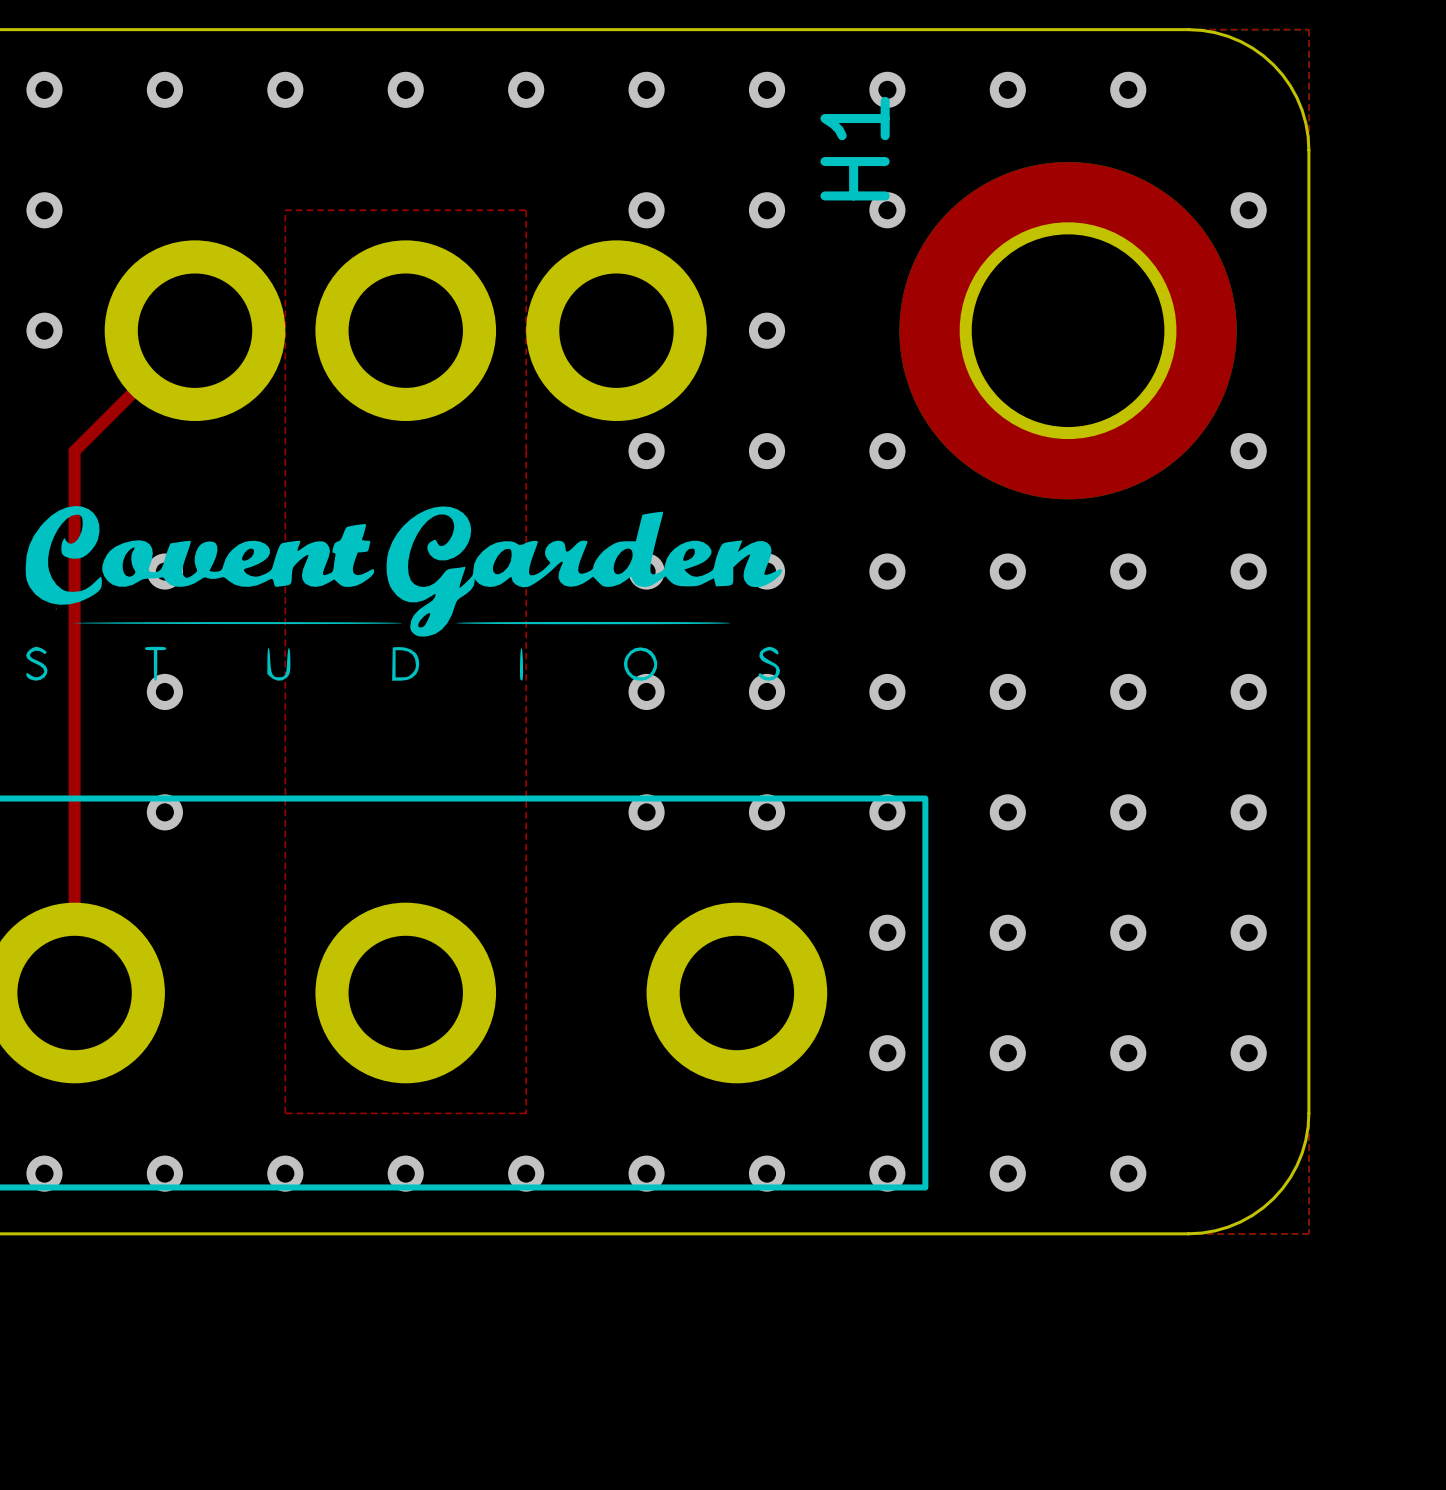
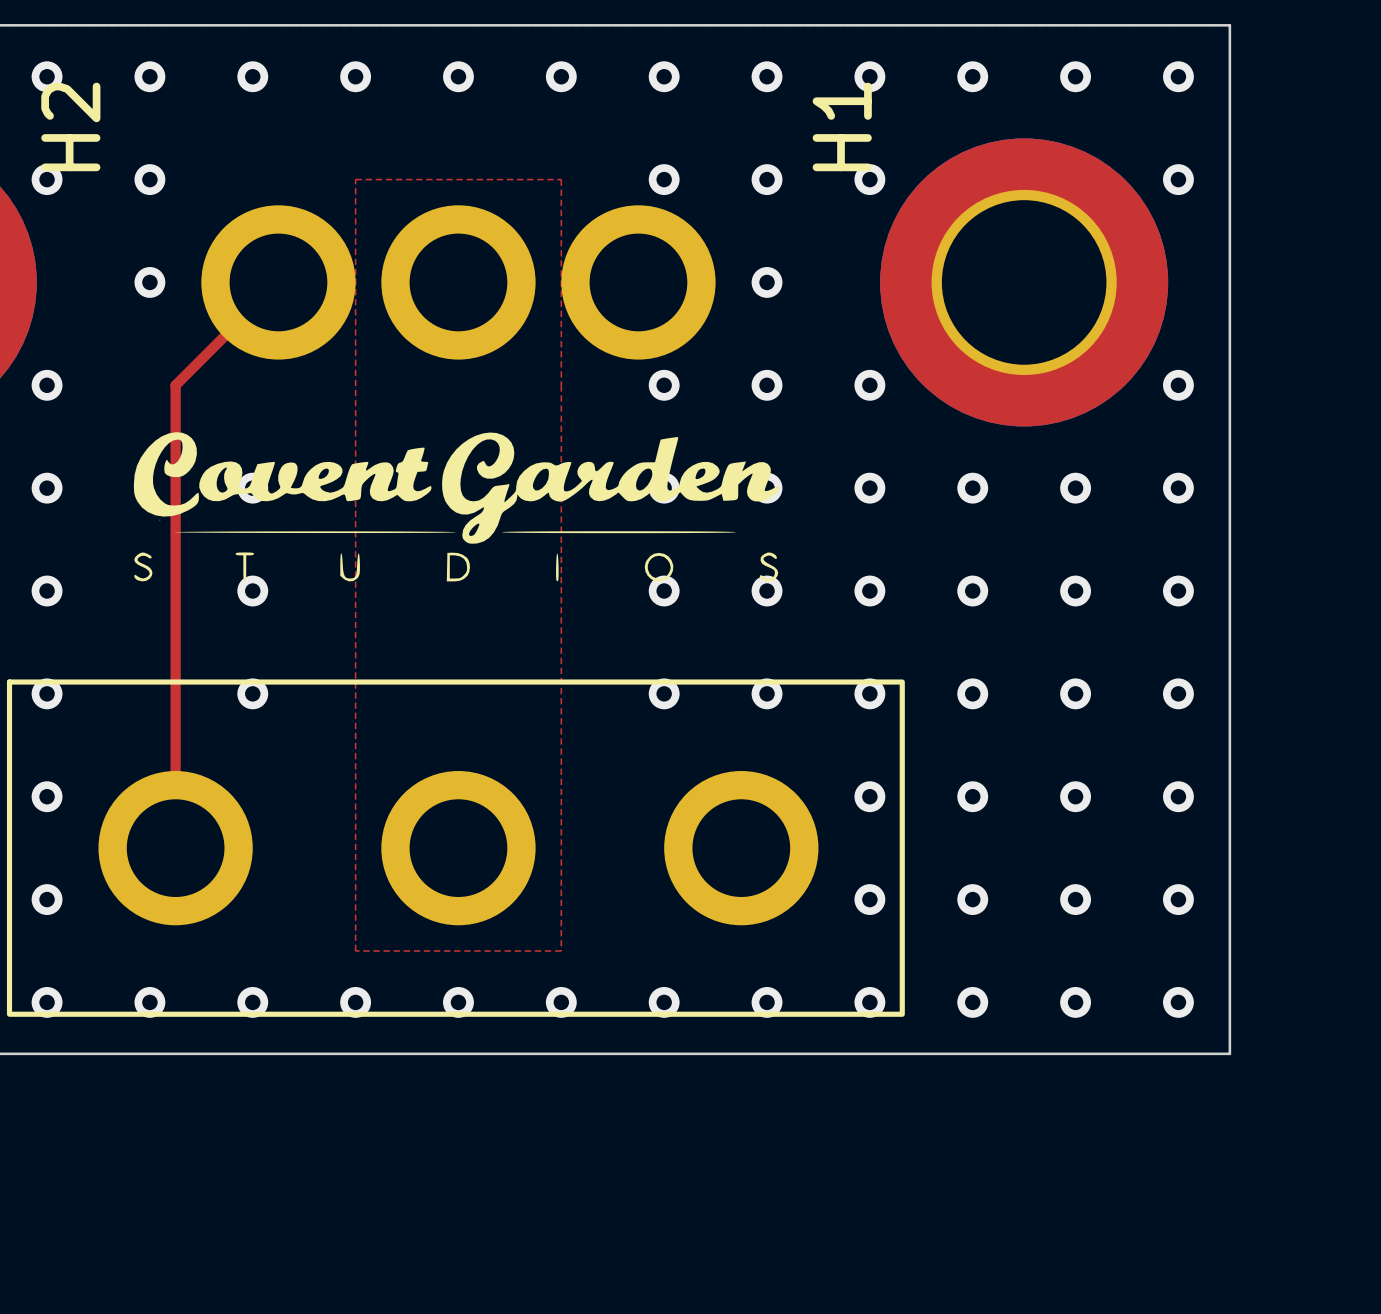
board edge: (1188, 29) (1201, 30) (1228, 36) (1252, 48) (1273, 64) (1282, 74) (1296, 97) (1305, 123) (1308, 150) -> (1127, 25) (1229, 25) (1229, 128)
via: none -> (1178, 76)
board edge: (1308, 1113) (1308, 1126) (1302, 1153) (1290, 1177) (1273, 1198) (1252, 1215) (1228, 1227) (1201, 1233) (1188, 1233) -> (1229, 950) (1229, 1053) (1127, 1053)
via: none -> (1178, 1002)

